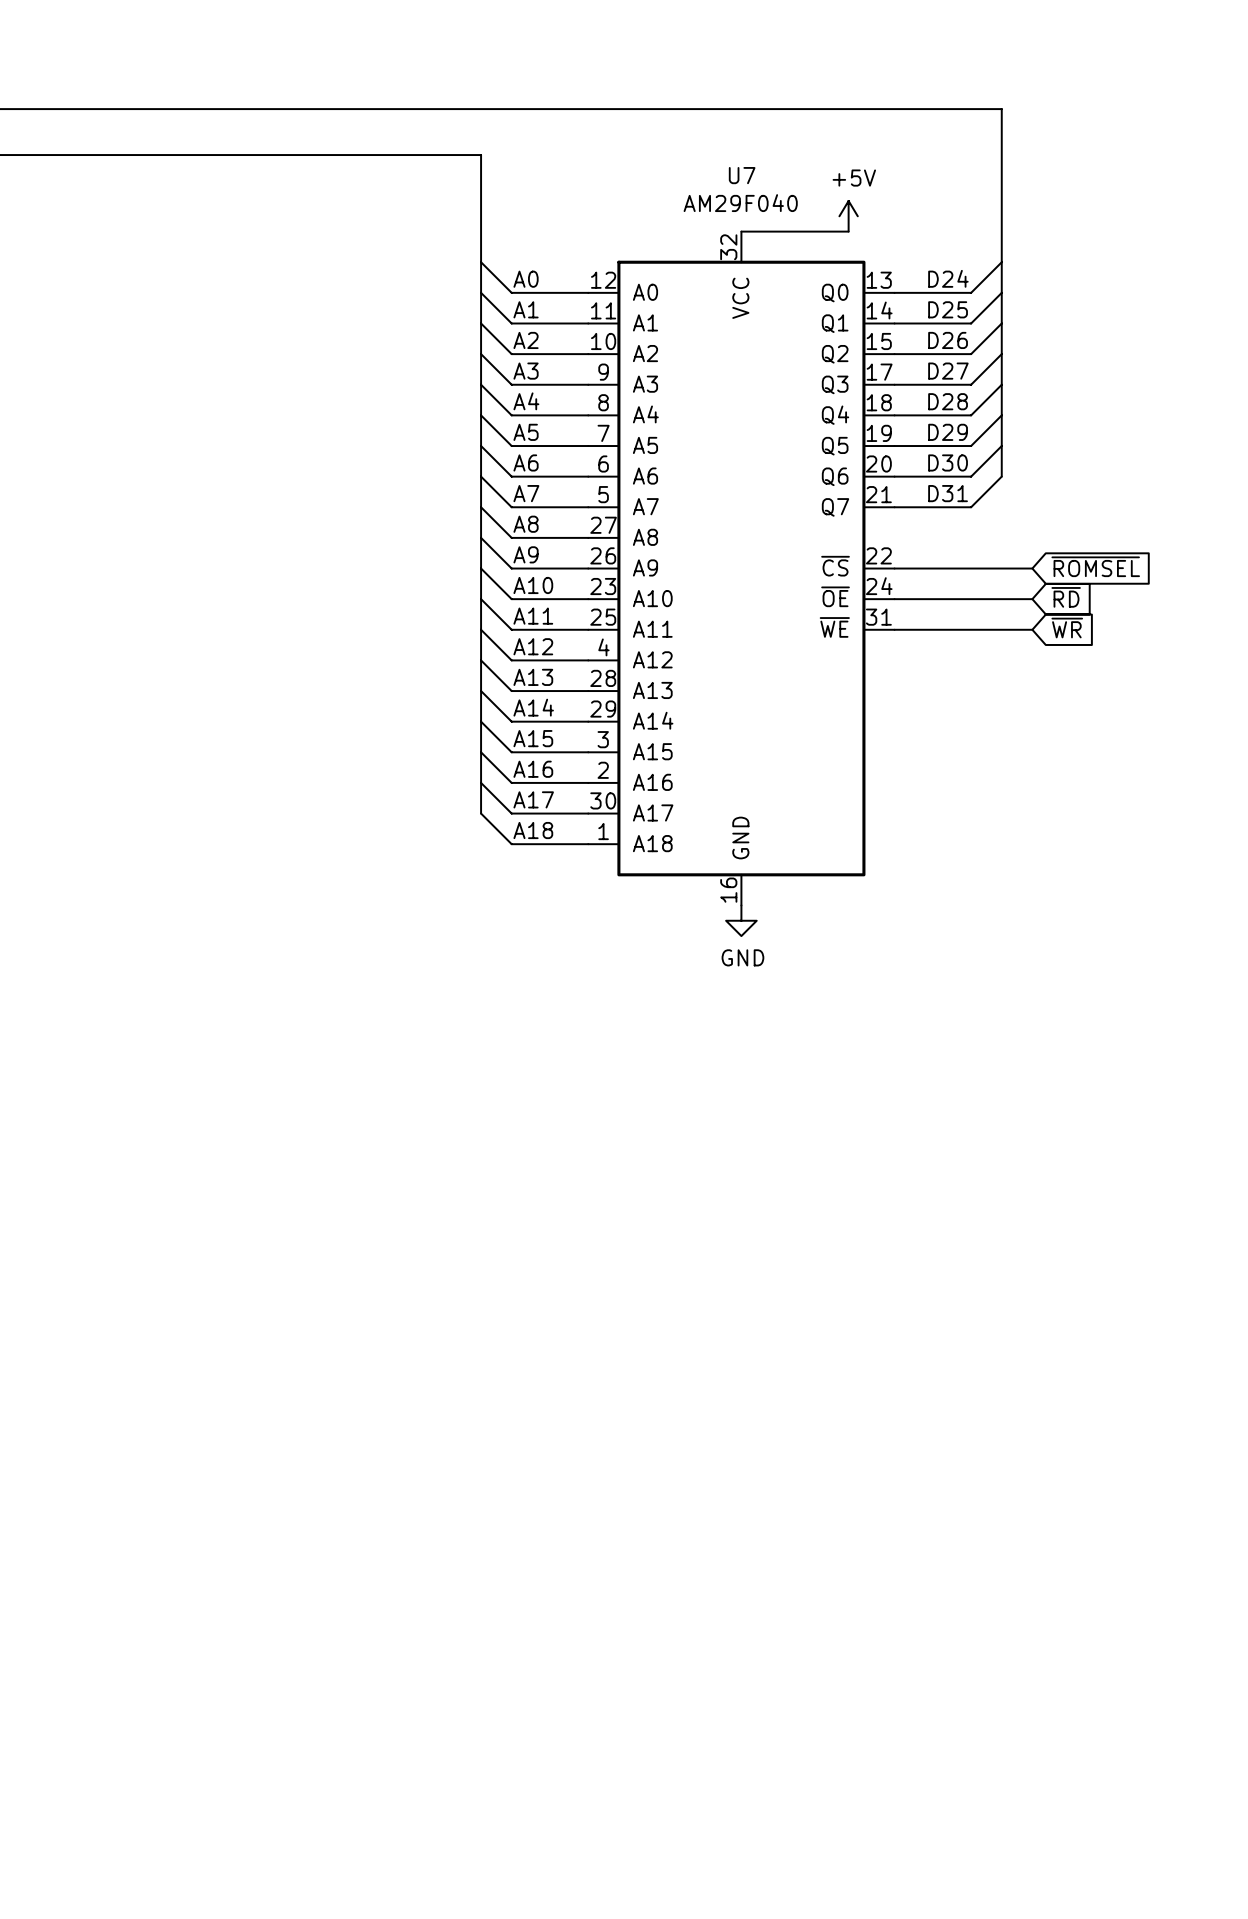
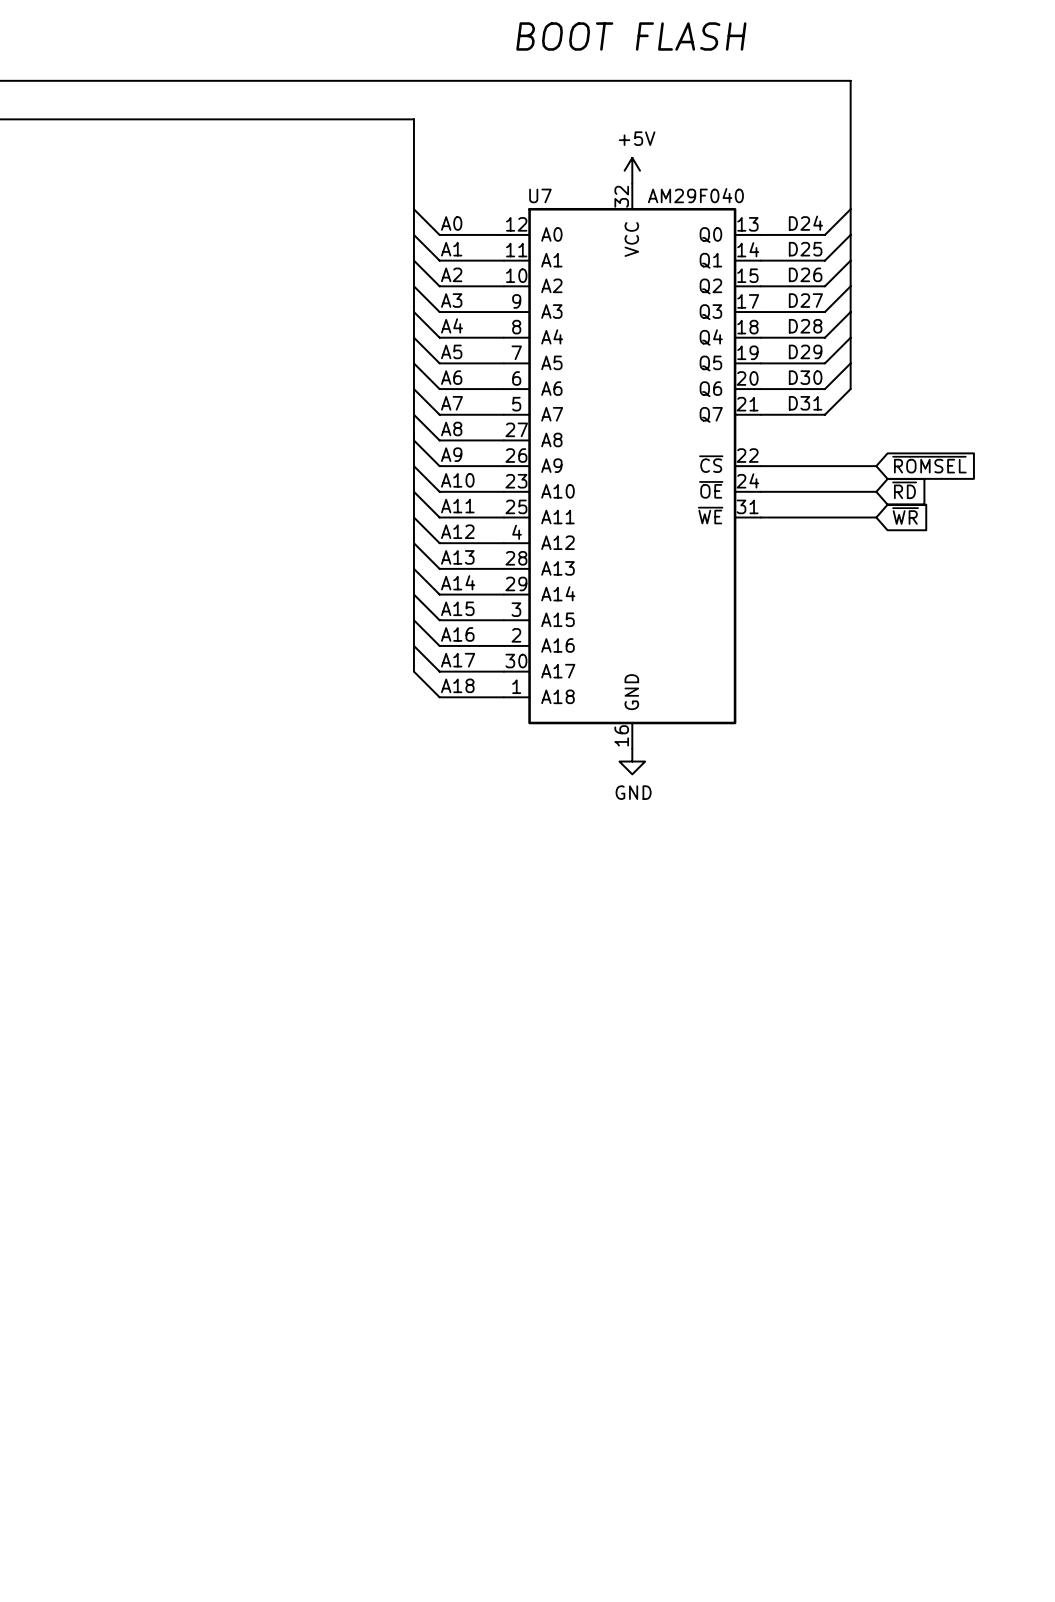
text: none -> BOOT FLASH (631, 36)
U7 name position: U7 (742, 175) -> U7 (540, 195)
U7 value position: AM29F040 (740, 203) -> AM29F040 (695, 195)
power symbol position: +5V (848, 216) -> +5V (632, 170)
wire: (741, 231) (848, 231) -> none

